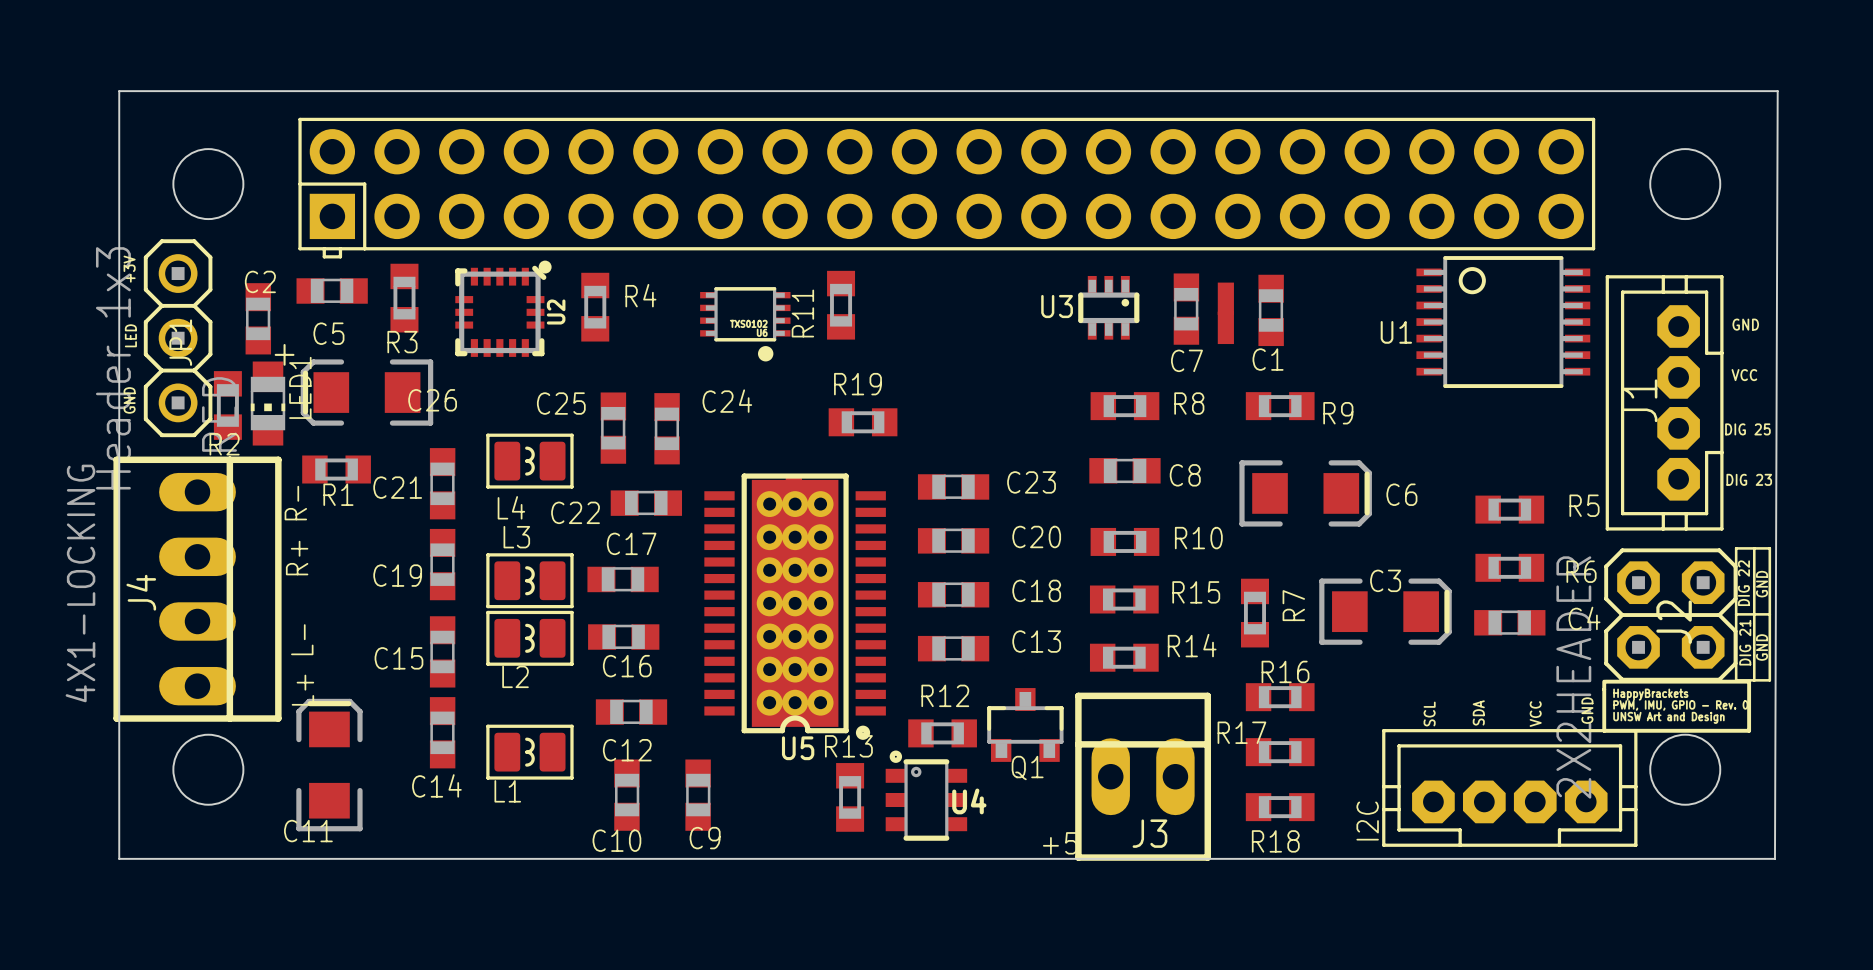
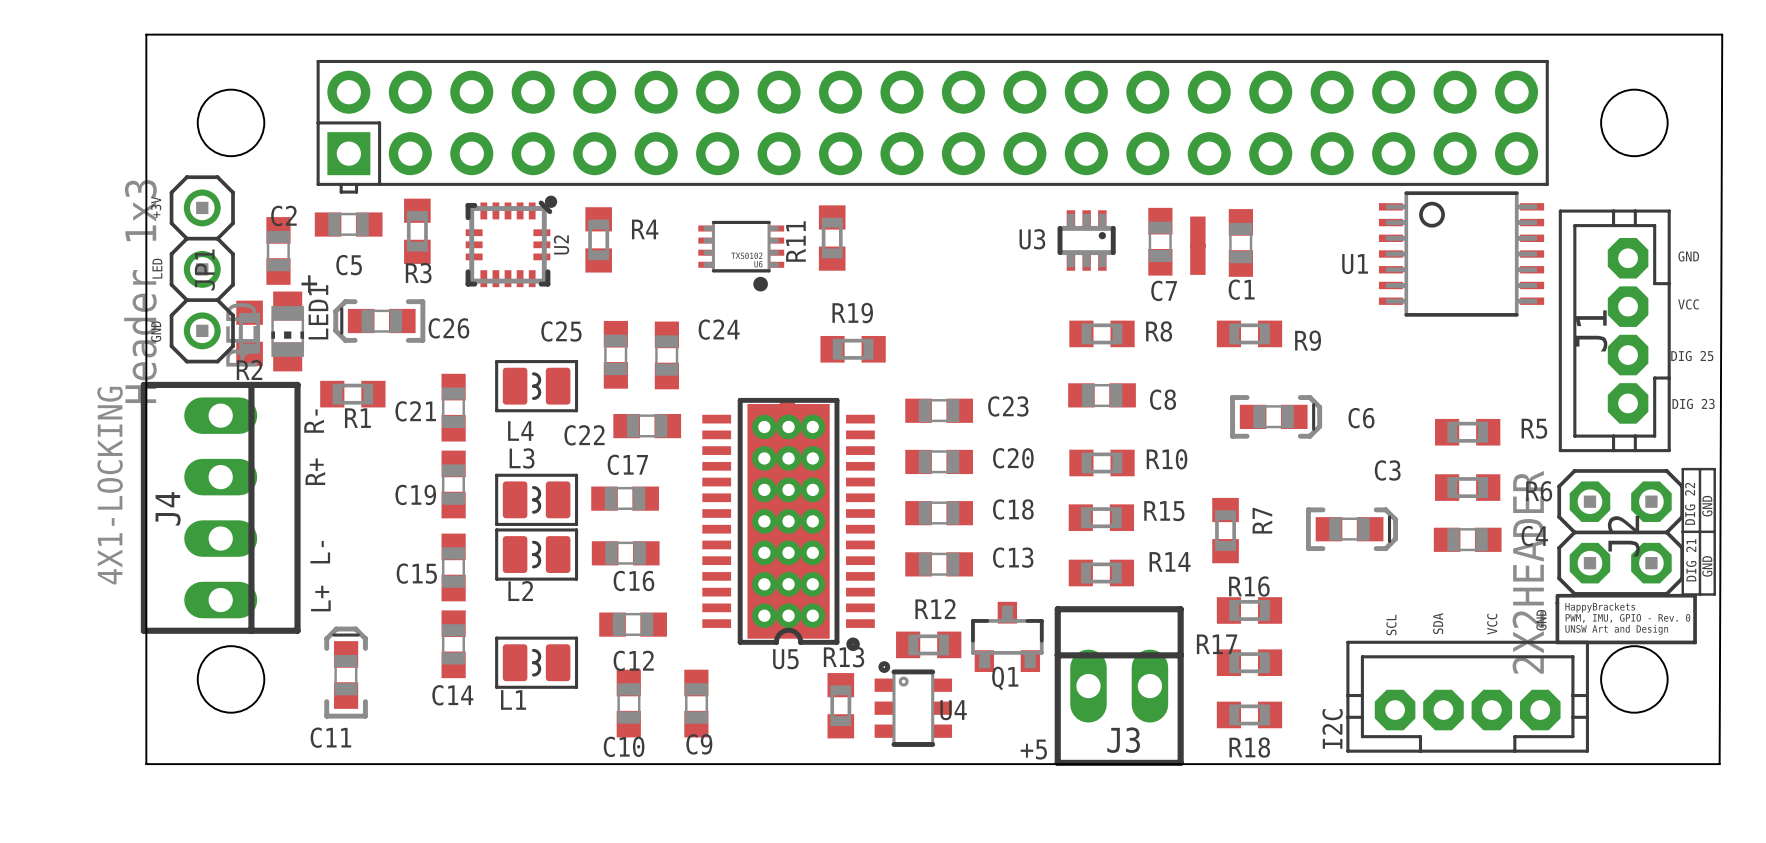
C26 footprint: [300, 359, 434, 426] -> [333, 299, 426, 343]
C6 footprint: [1239, 460, 1372, 527] -> [1230, 395, 1323, 439]
C3 footprint: [1319, 578, 1452, 645] -> [1305, 507, 1398, 552]
C11 footprint: [296, 698, 363, 832] -> [324, 626, 368, 719]

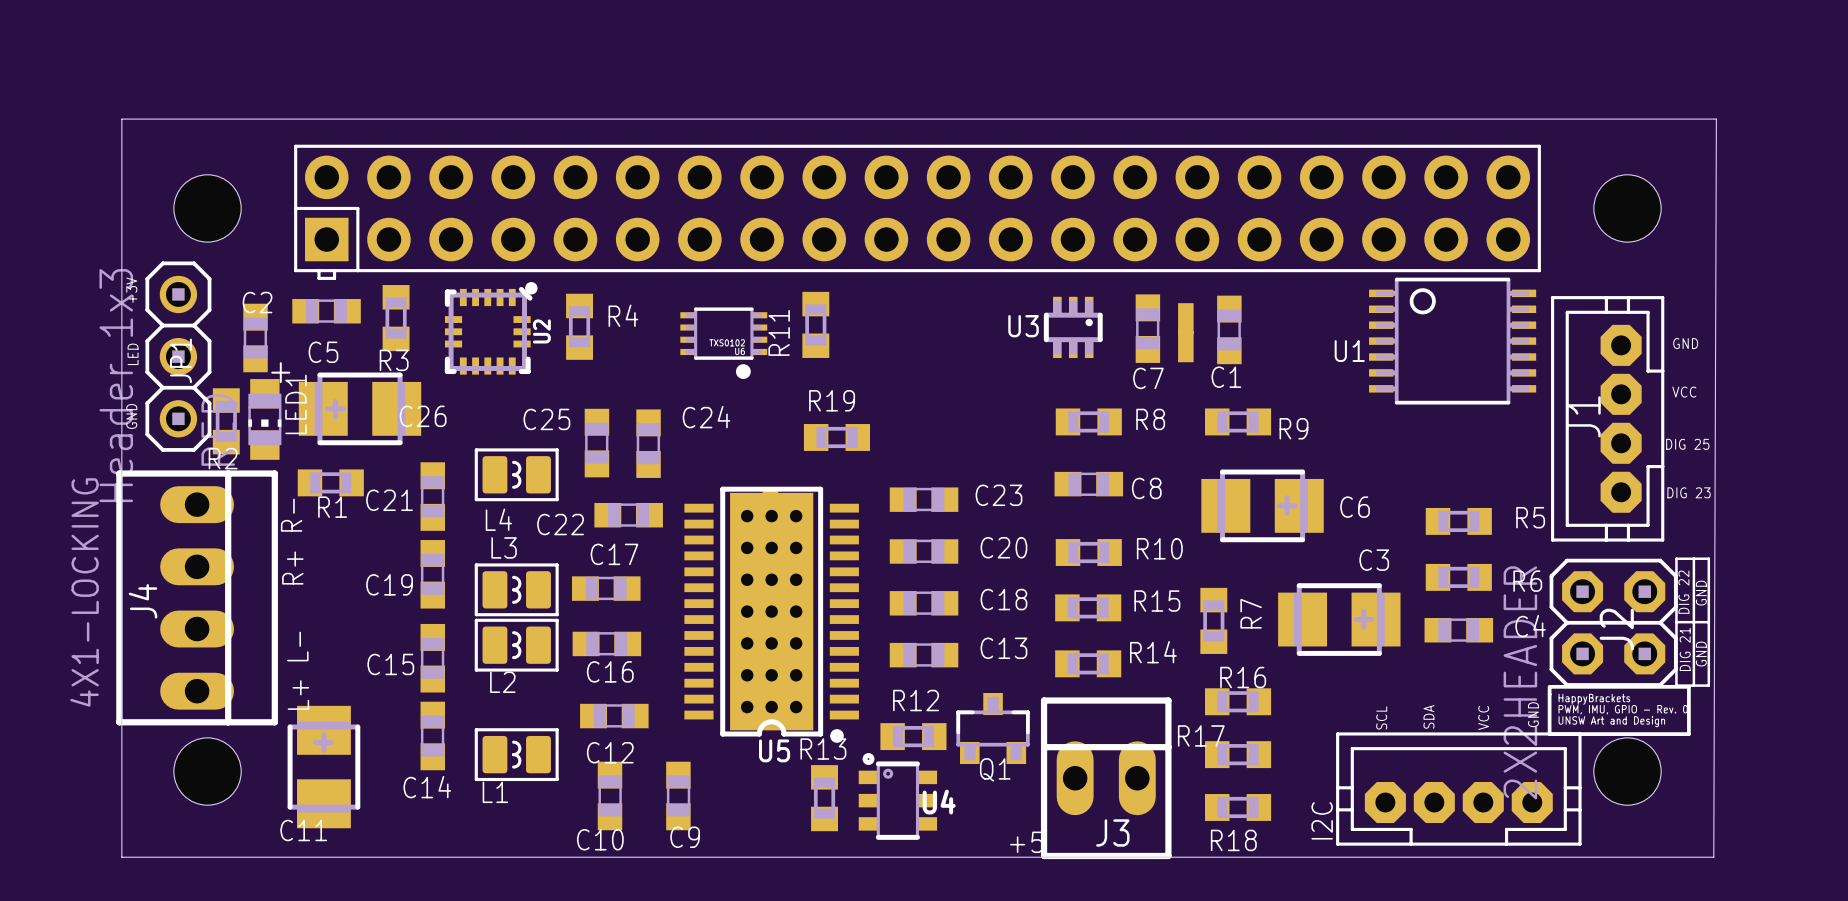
C26 footprint: [333, 299, 426, 343] -> [298, 372, 422, 446]
C6 footprint: [1230, 395, 1323, 439] -> [1201, 469, 1324, 543]
C3 footprint: [1305, 507, 1398, 552] -> [1278, 583, 1401, 656]
C11 footprint: [324, 626, 368, 719] -> [287, 705, 361, 829]

